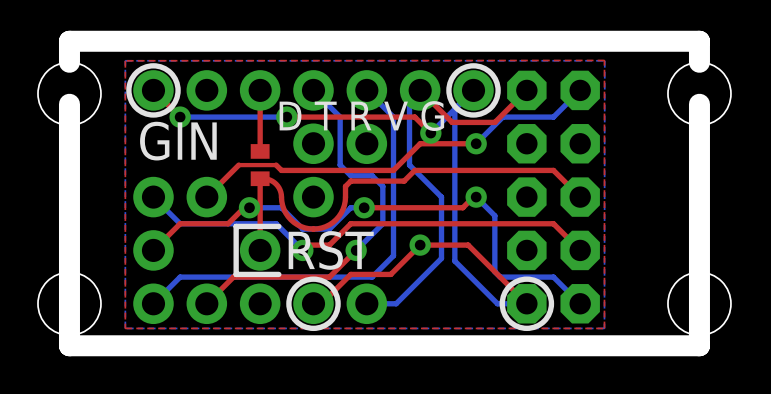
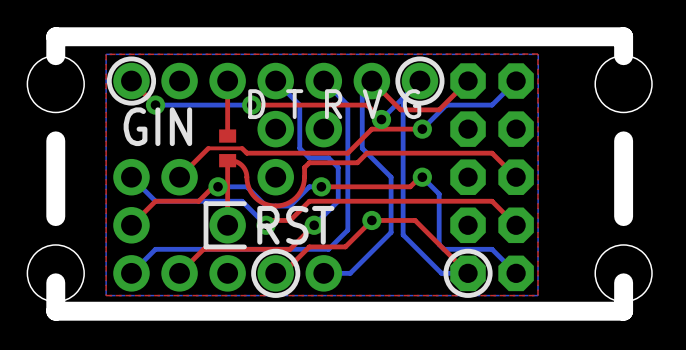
board edge: (69, 104) (69, 156) -> none
board edge: (699, 104) (699, 156) -> none
board edge: (69, 240) (69, 314) -> none
board edge: (699, 240) (699, 314) -> none

